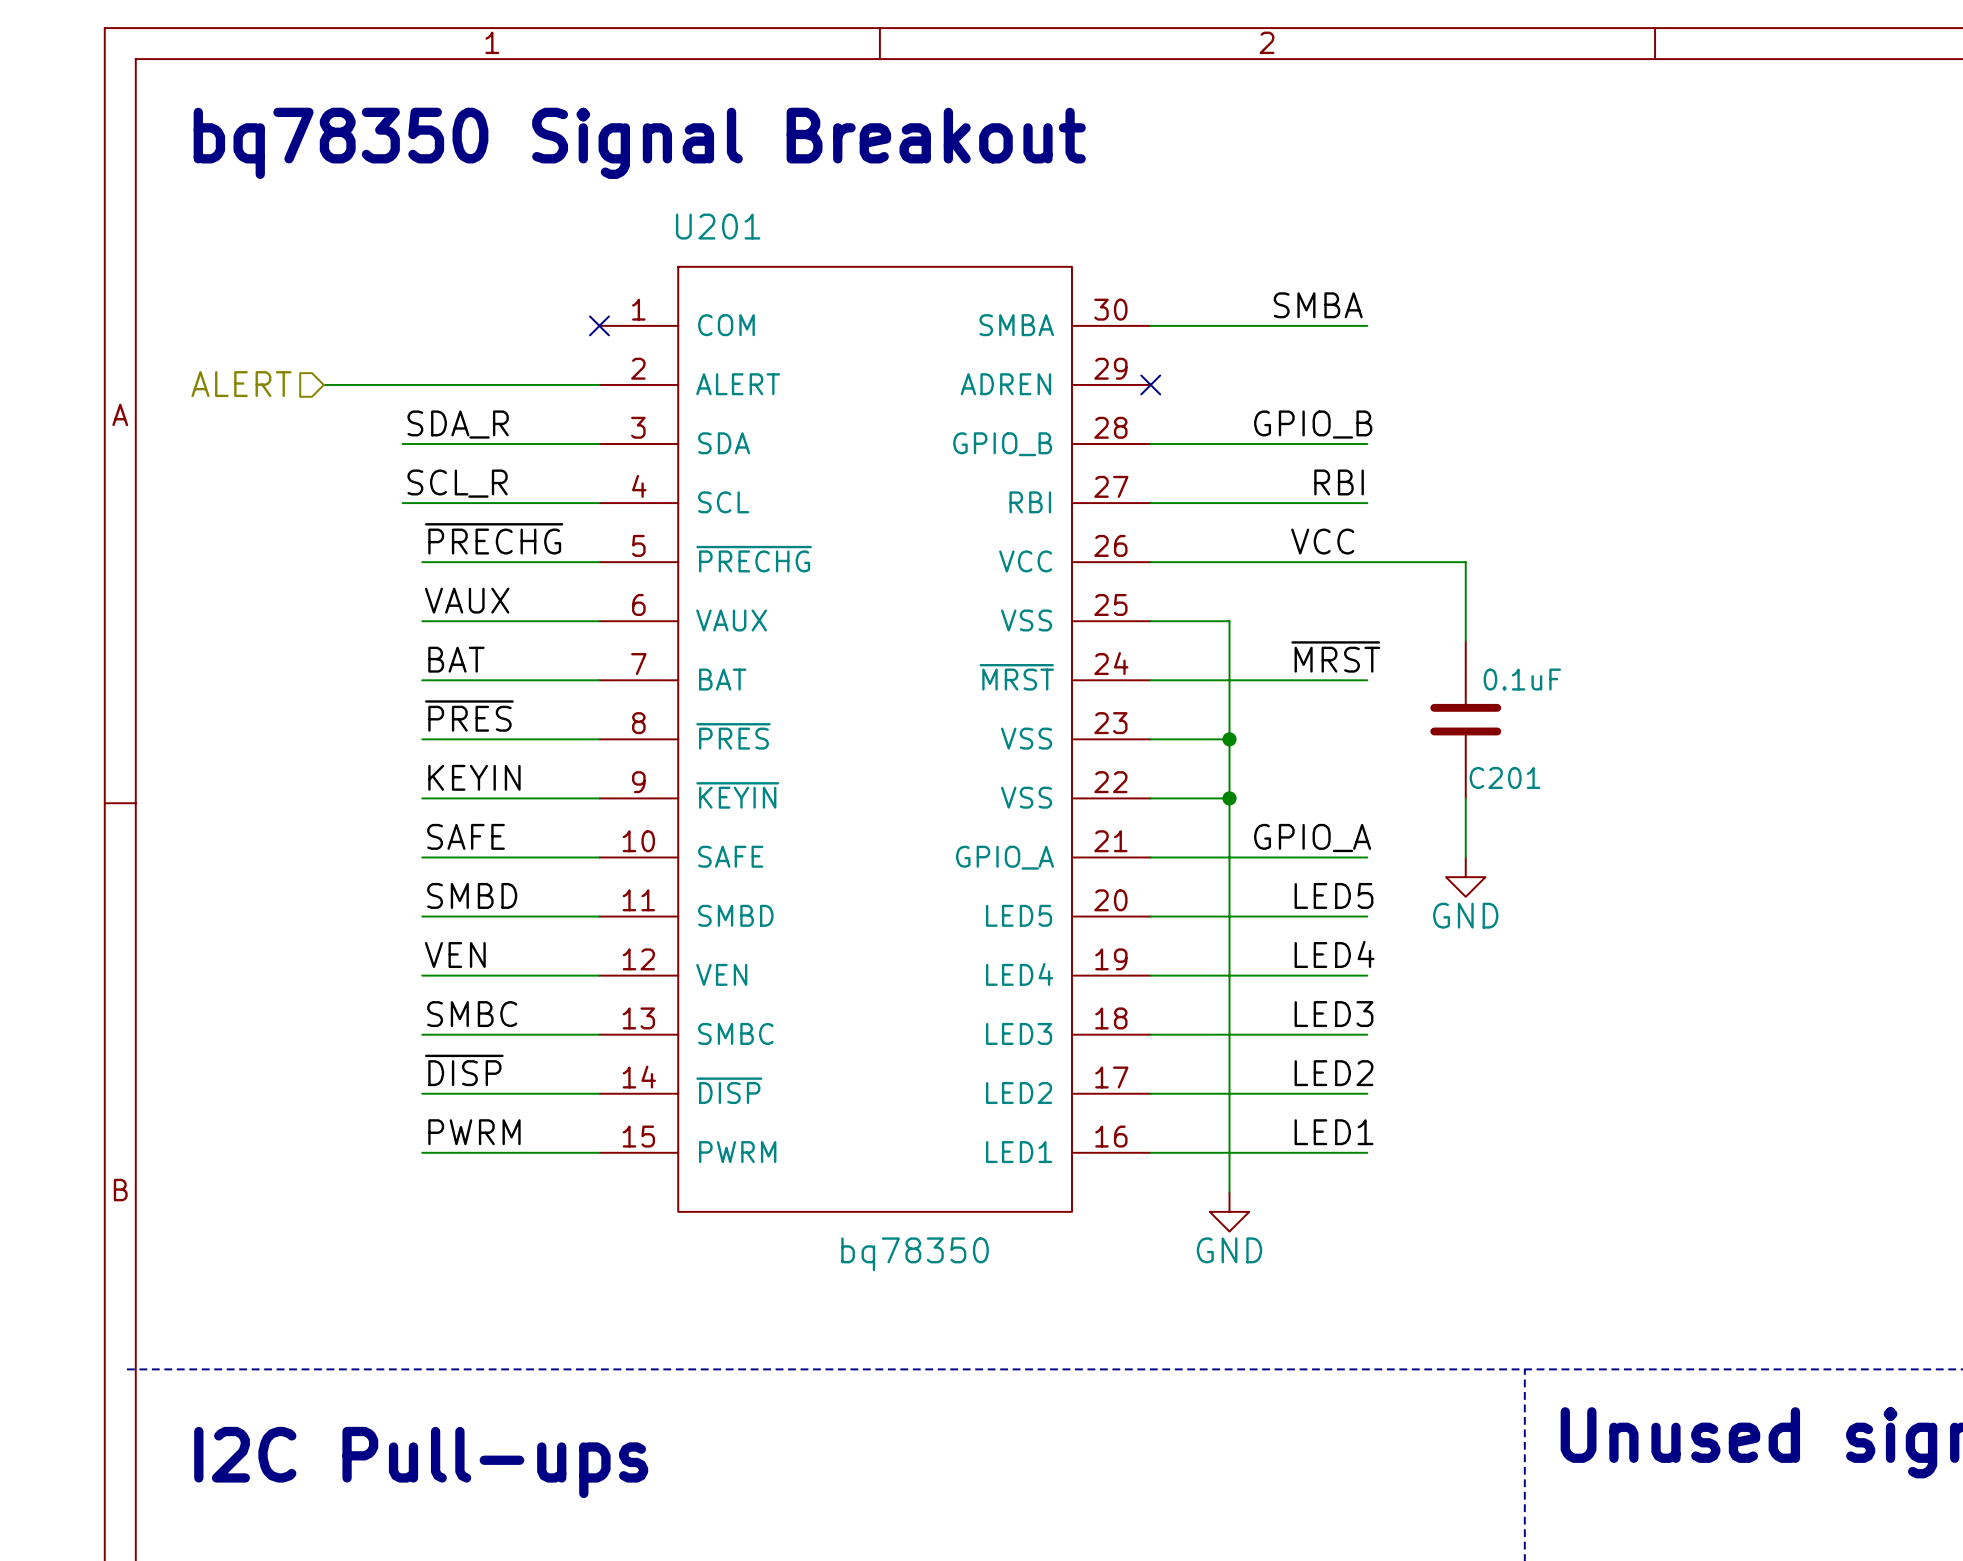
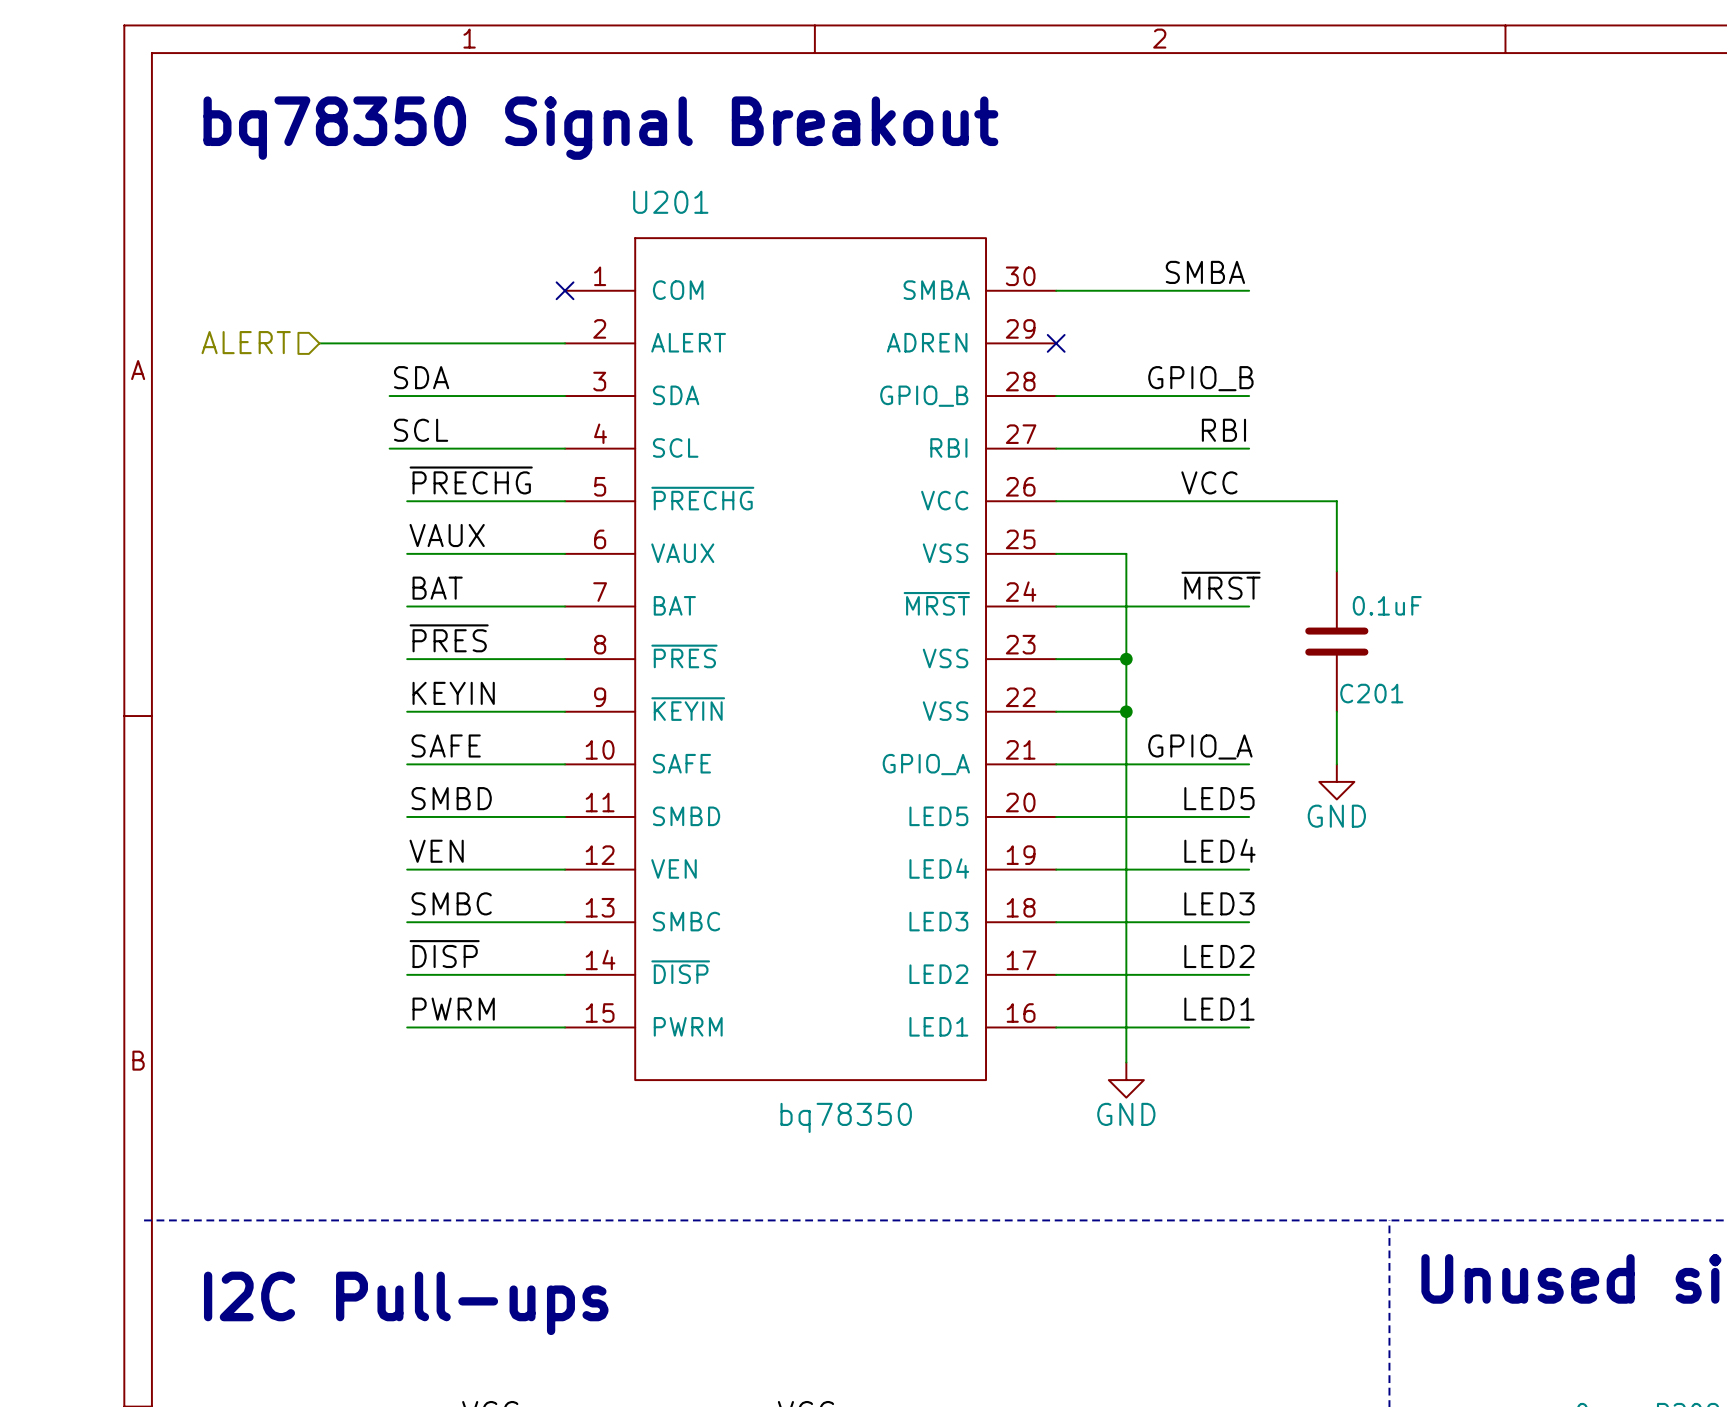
label: SDA_R (458, 424) -> SDA (421, 377)
label: SCL_R (457, 483) -> SCL (421, 430)

